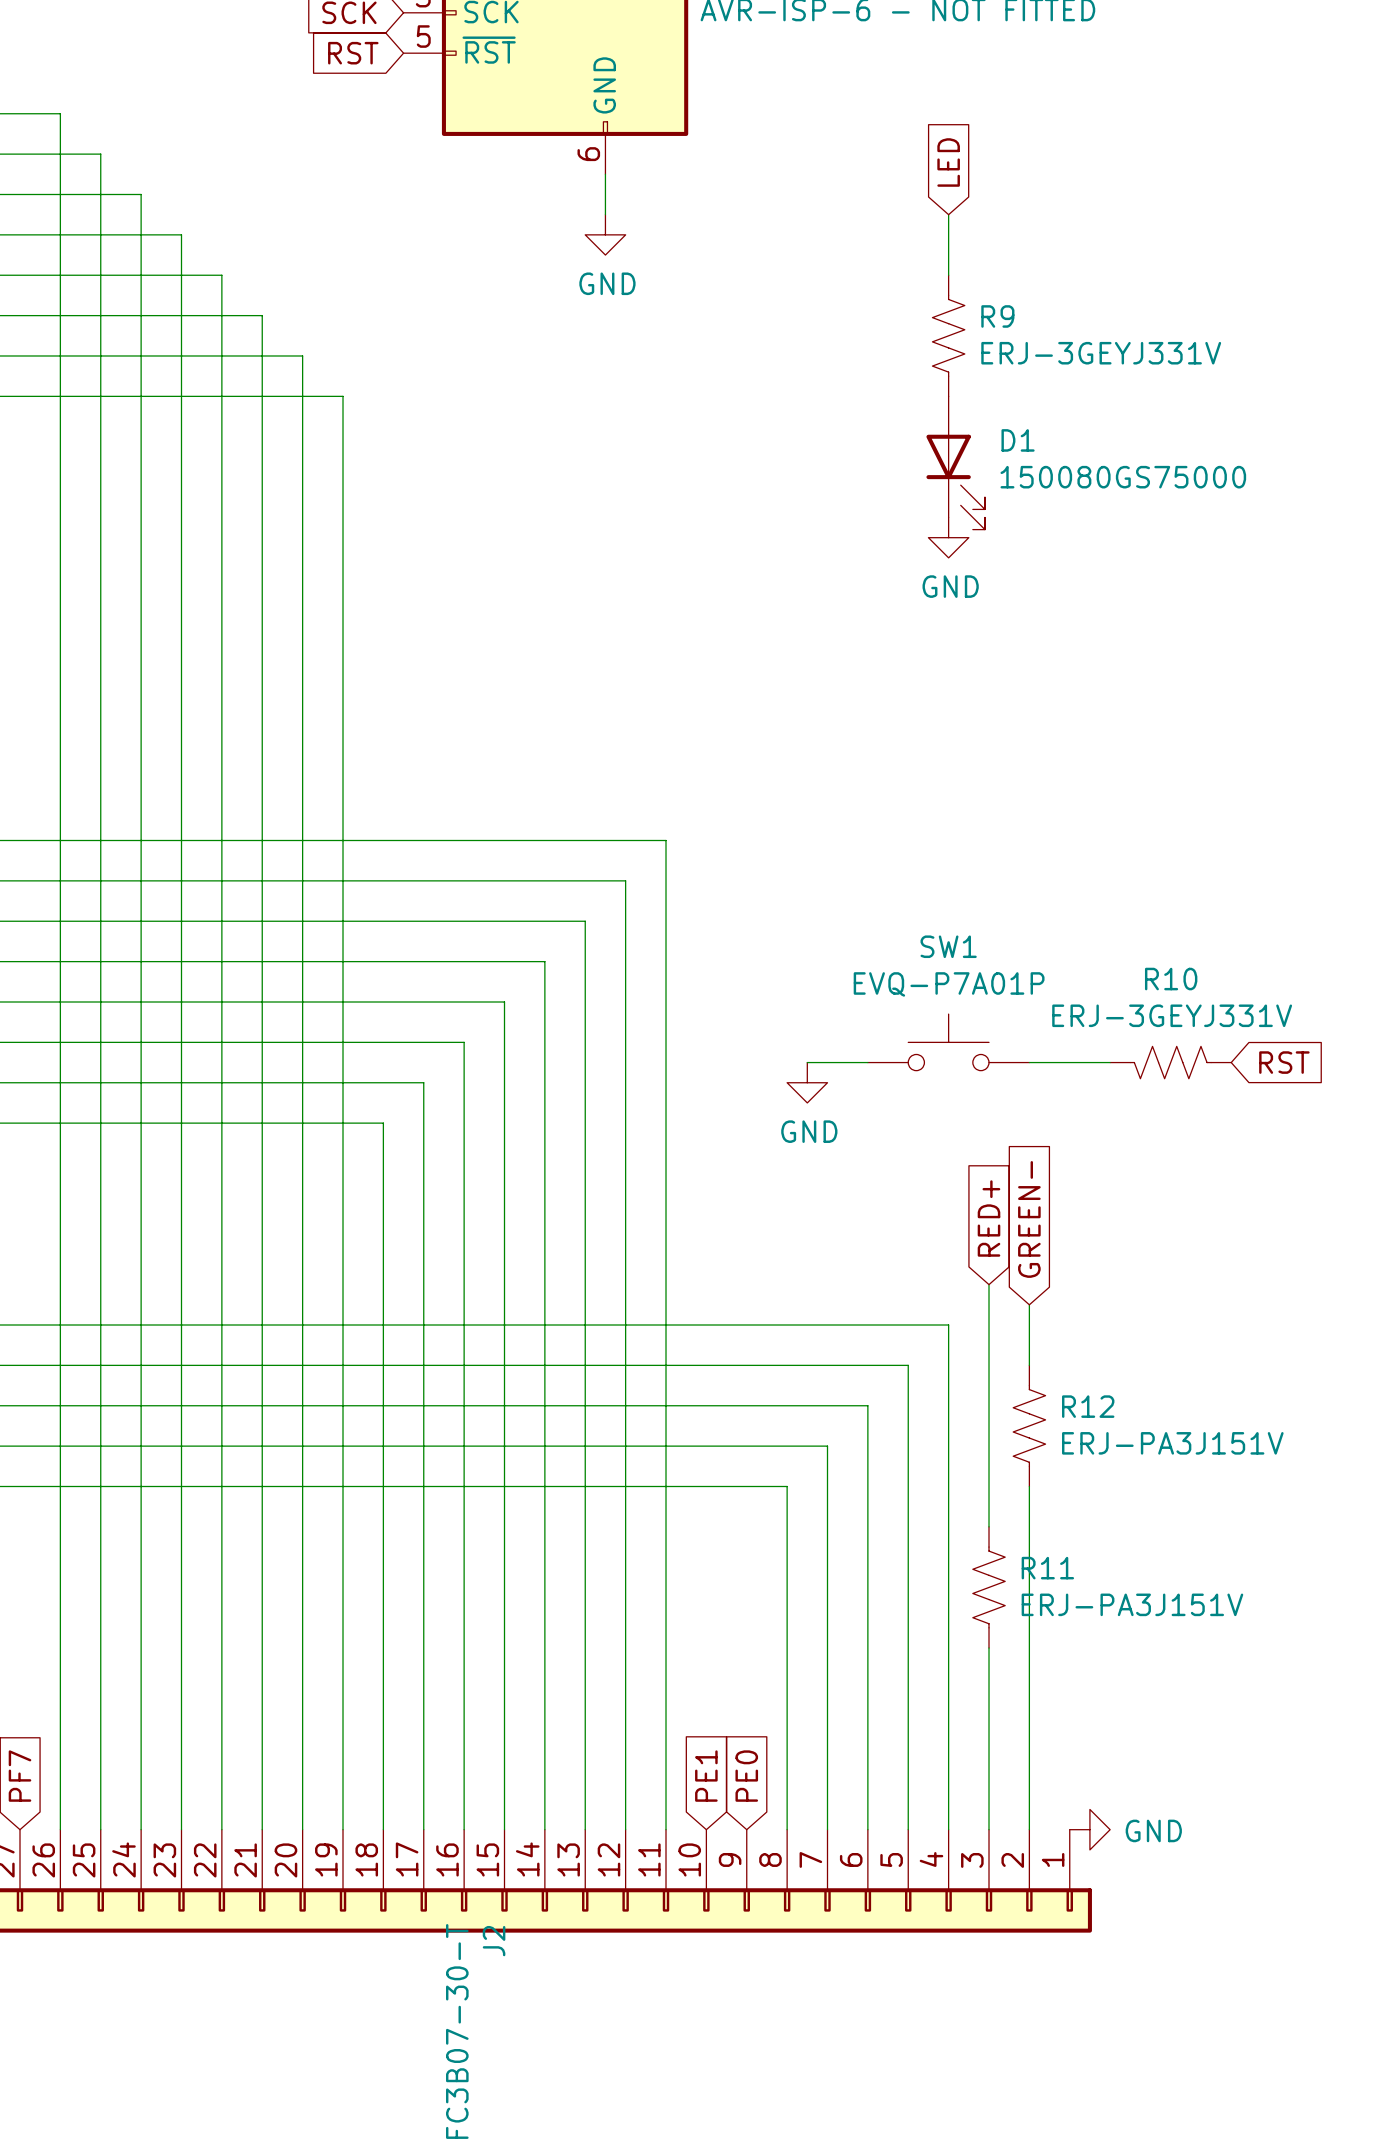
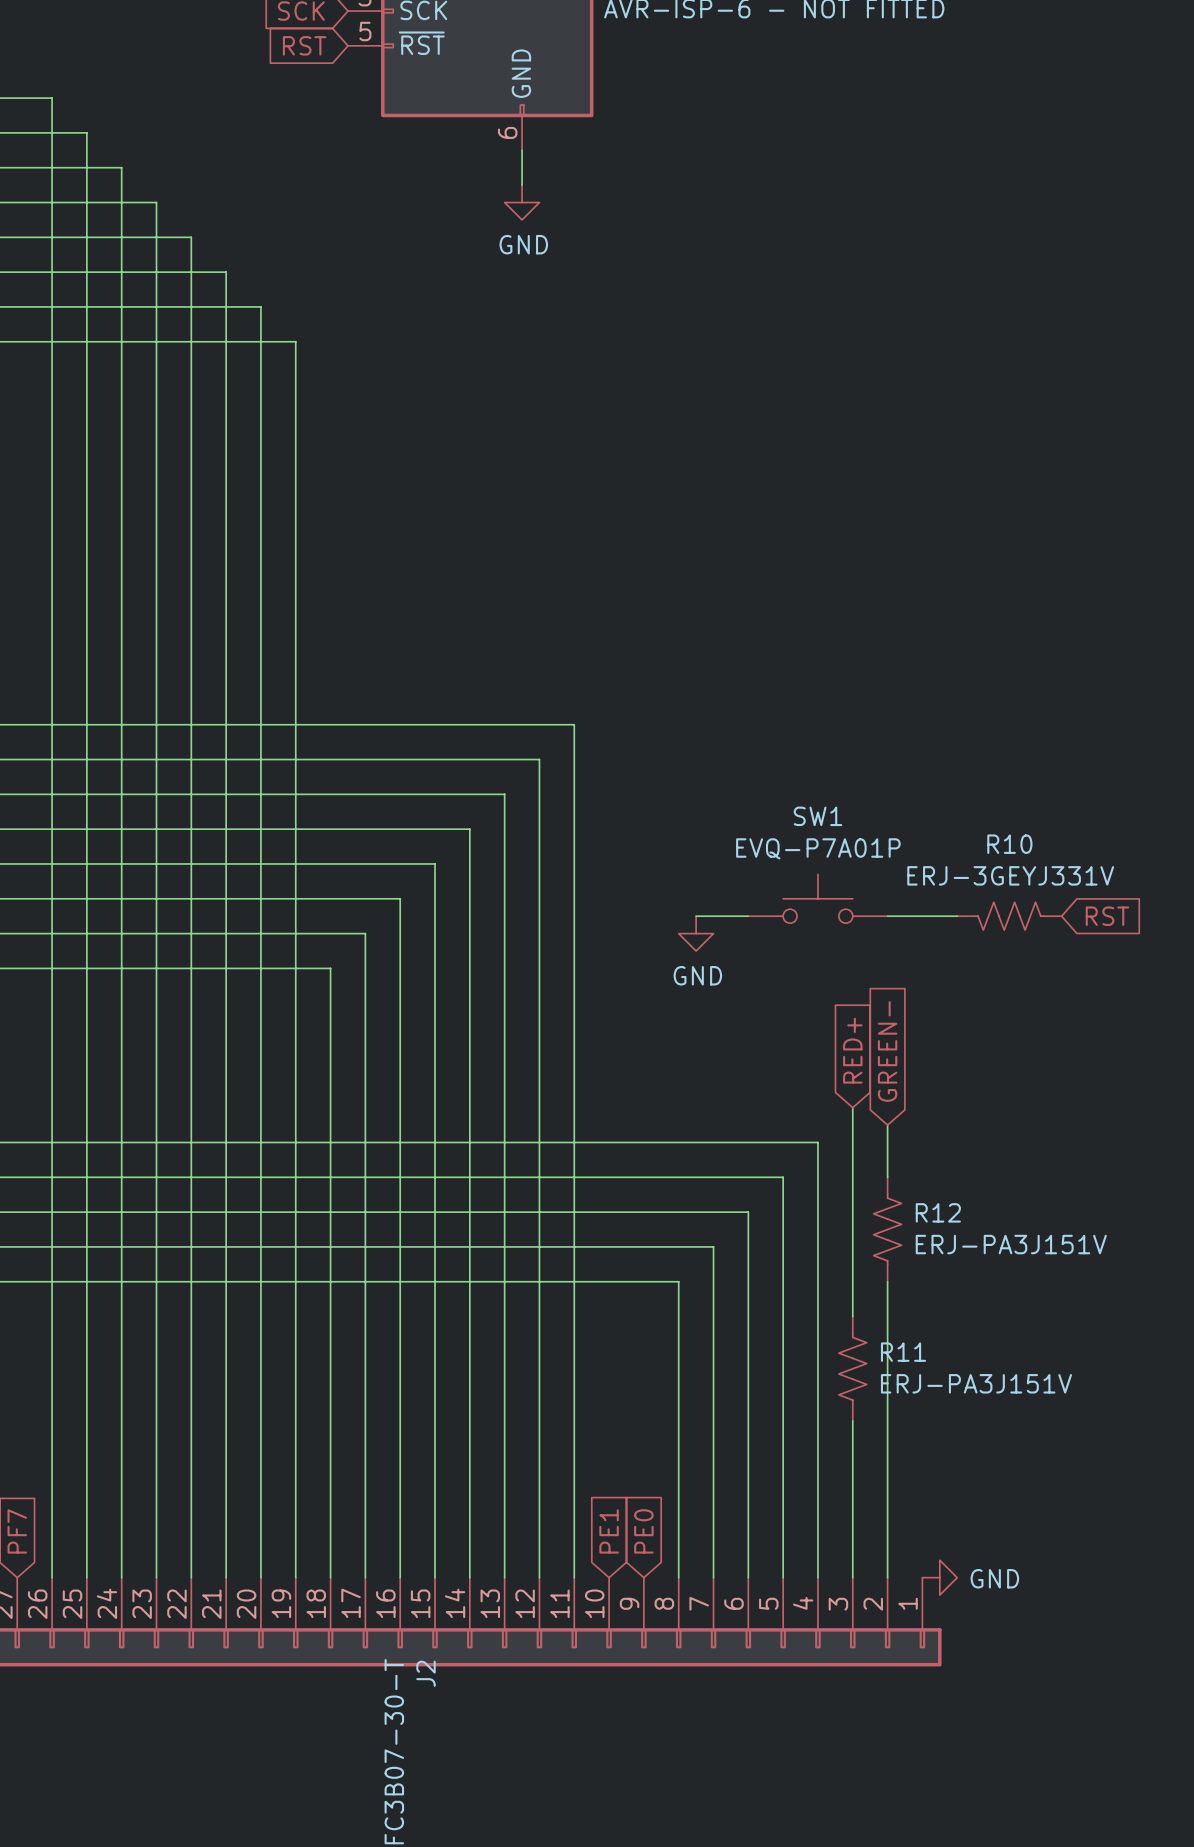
global label: LED (948, 162) -> none
wire: (948, 214) (948, 275) -> none
R9: ERJ-3GEYJ331V (948, 335) -> none
D1: 150080GS75000 (955, 462) -> none
power symbol: GND (948, 537) -> none

